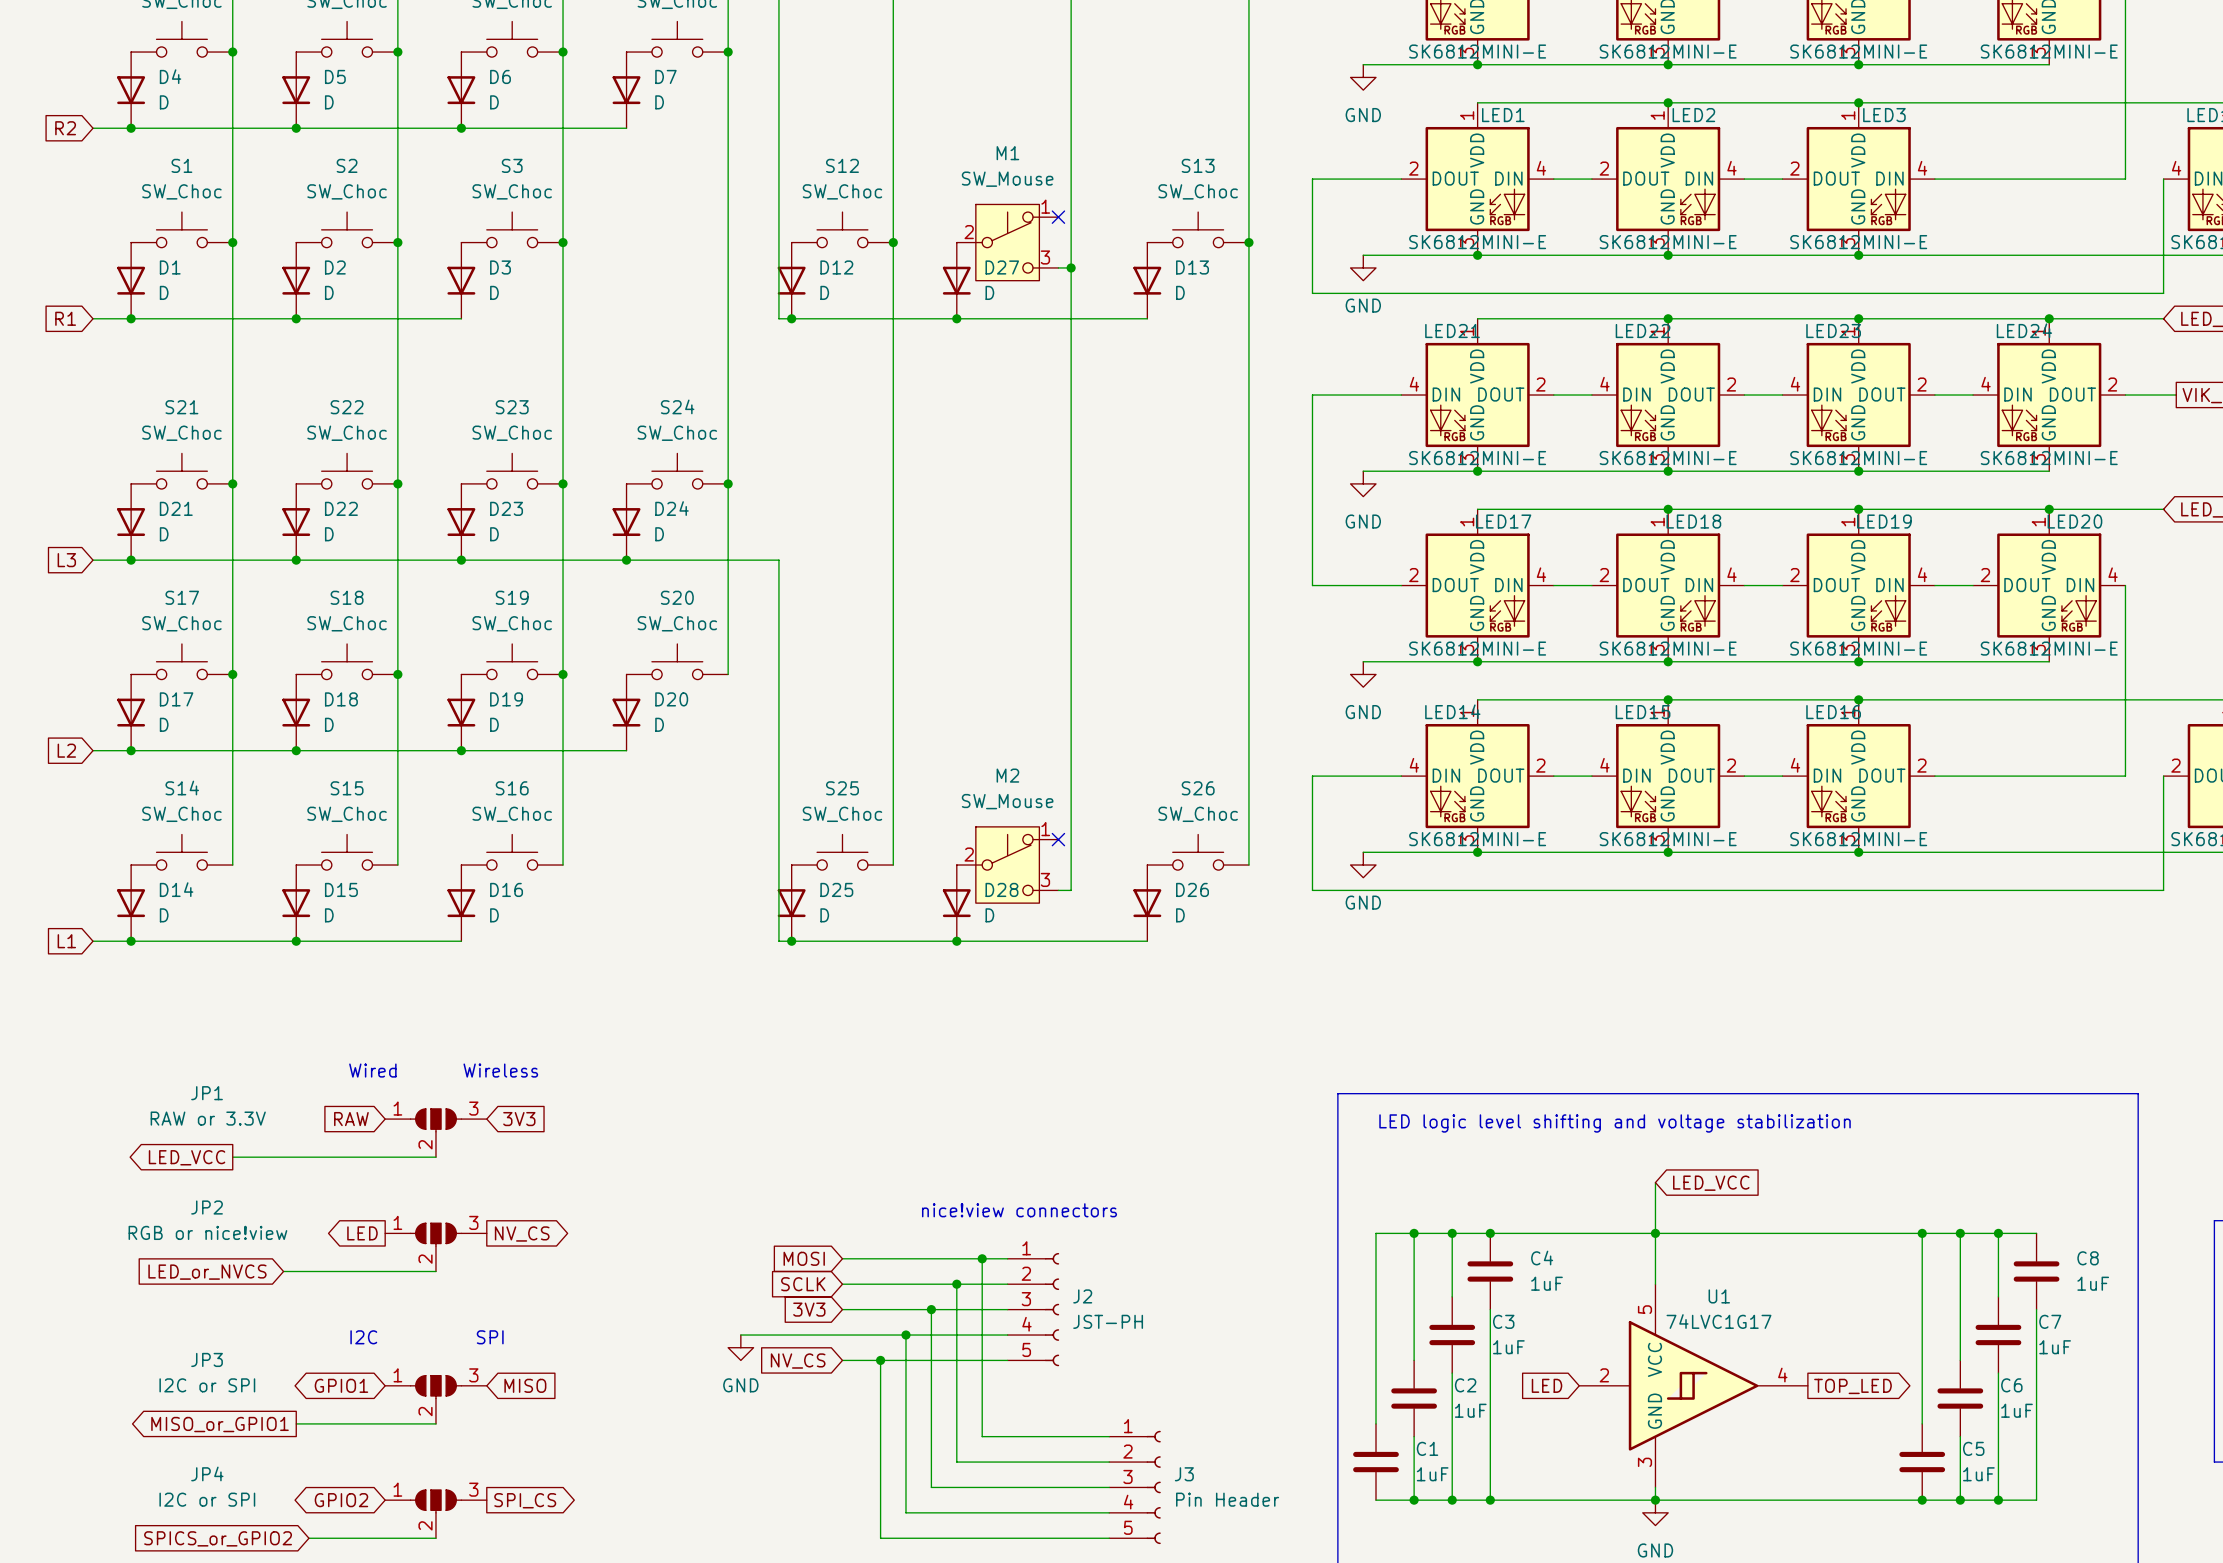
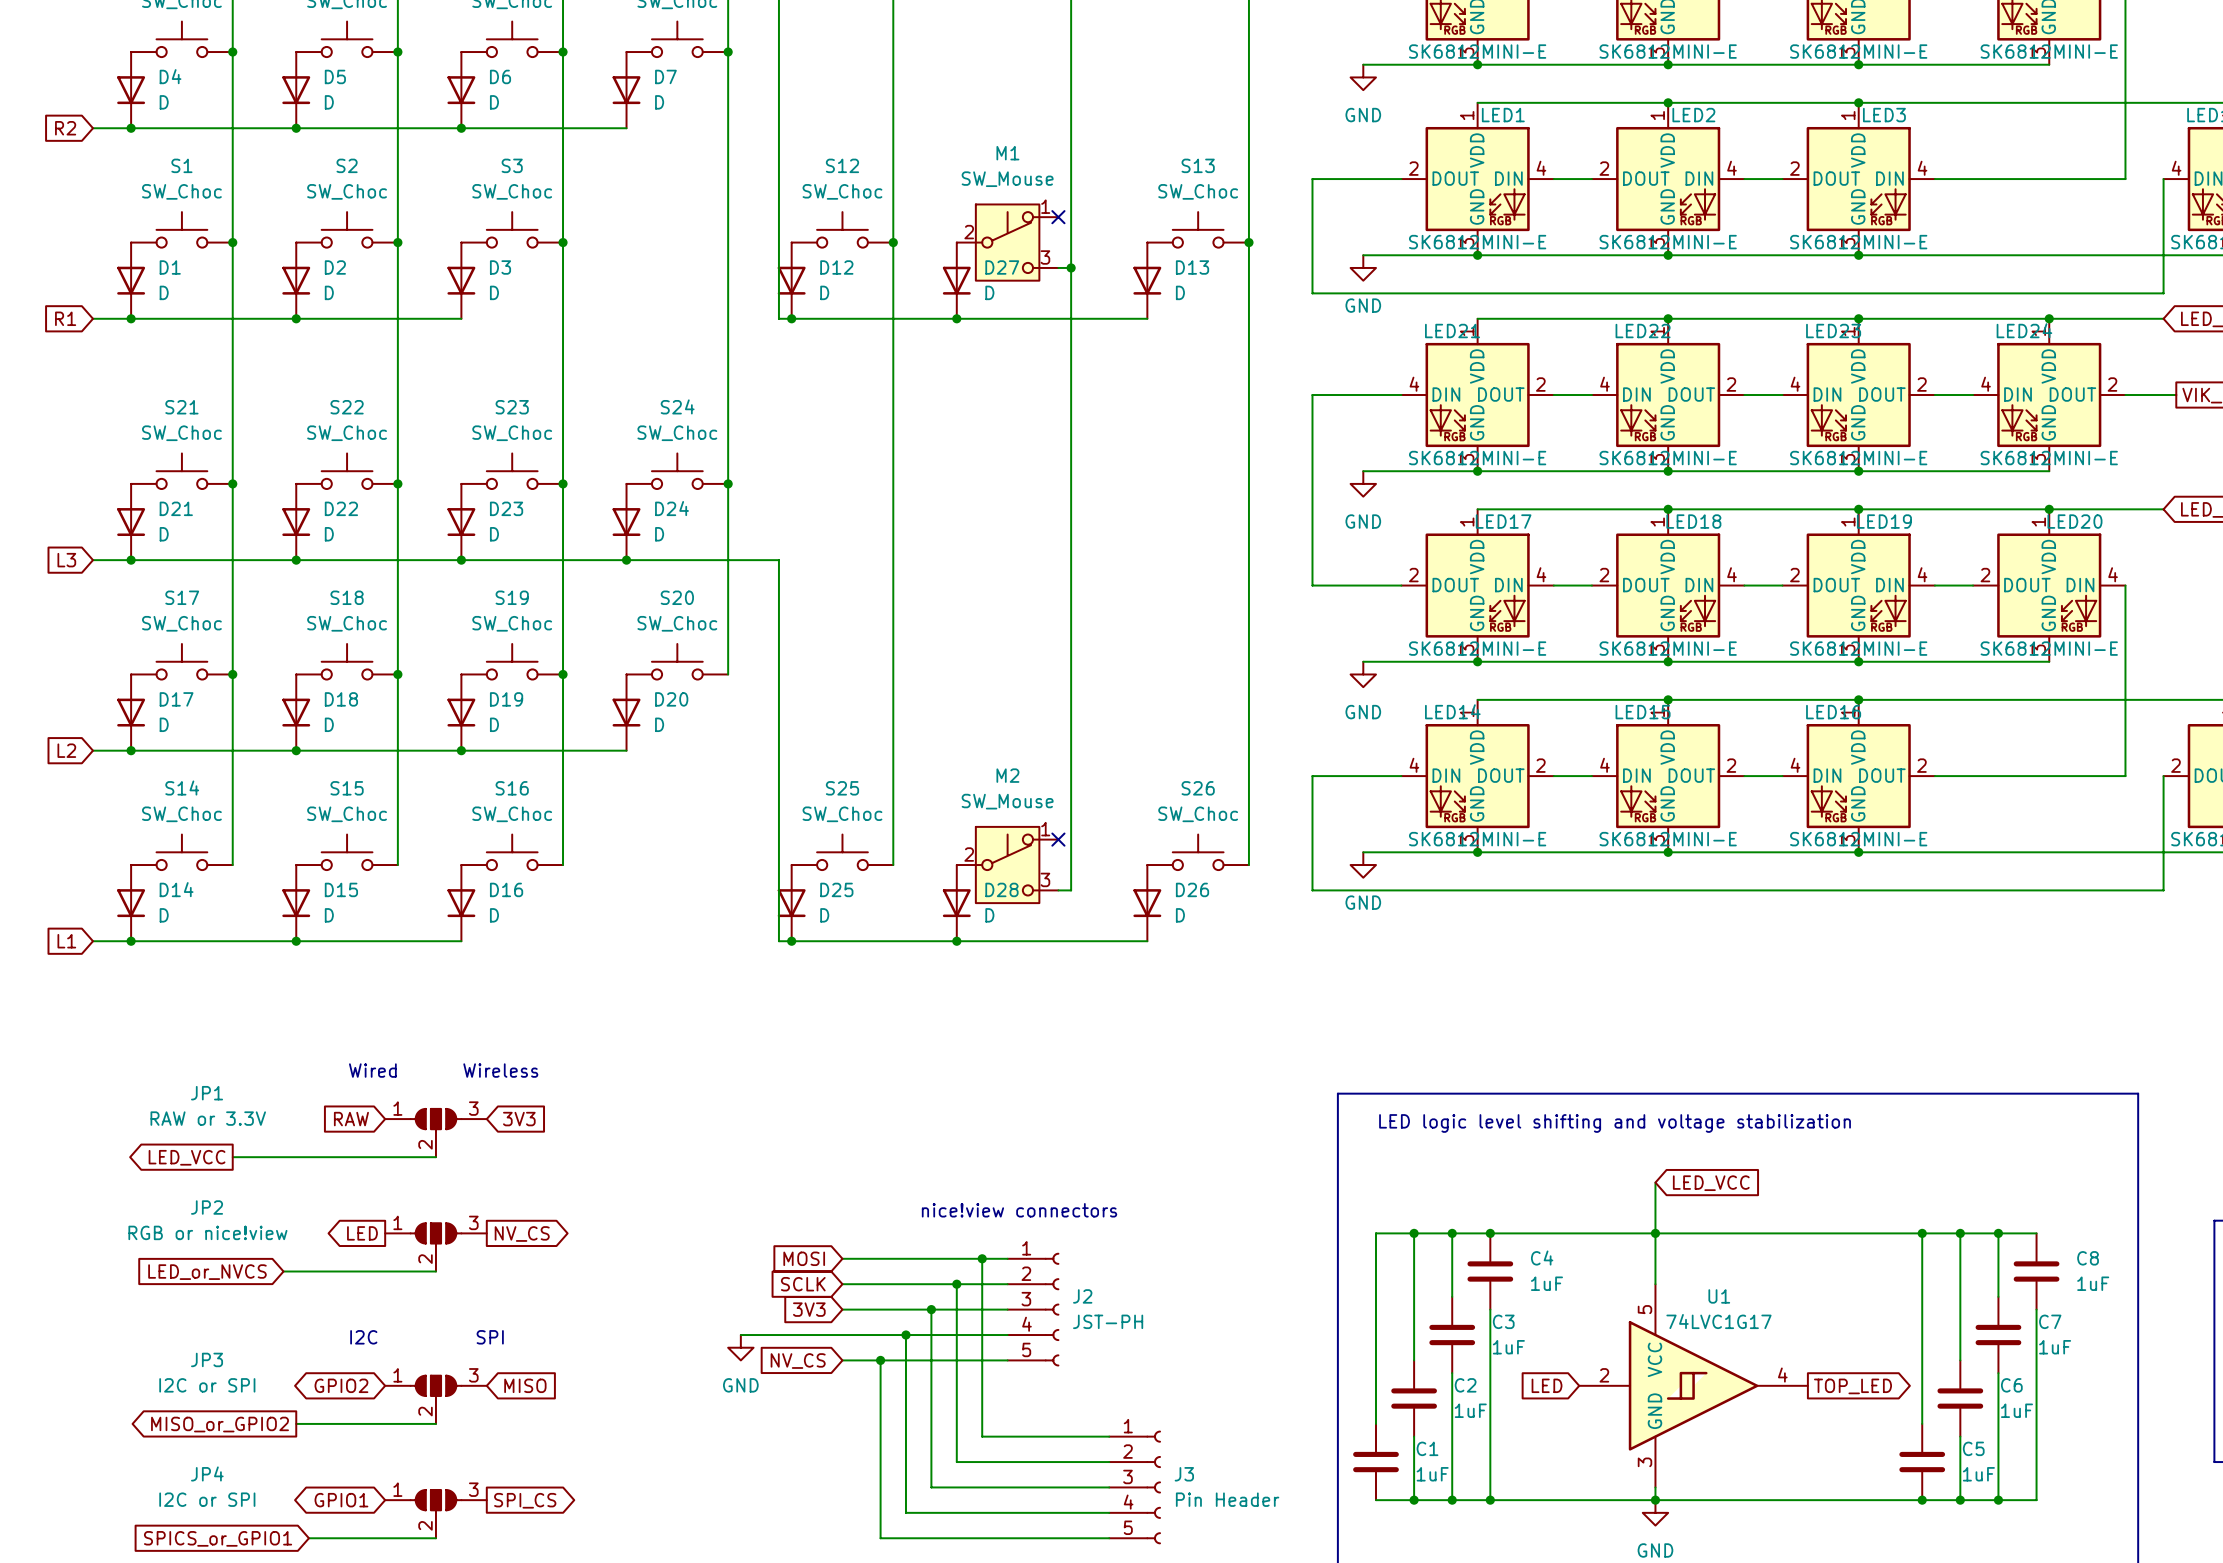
global label: GPIO1 (341, 1385) -> GPIO2 (341, 1385)
global label: MISO_or_GPIO1 (220, 1424) -> MISO_or_GPIO2 (220, 1424)
global label: GPIO2 (341, 1500) -> GPIO1 (341, 1500)
global label: SPICS_or_GPIO2 (218, 1538) -> SPICS_or_GPIO1 (218, 1538)

